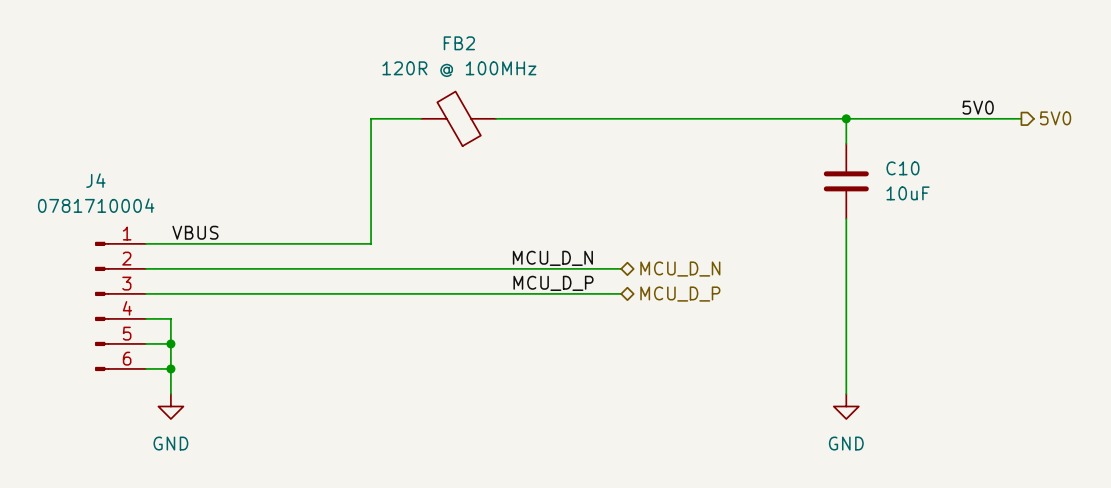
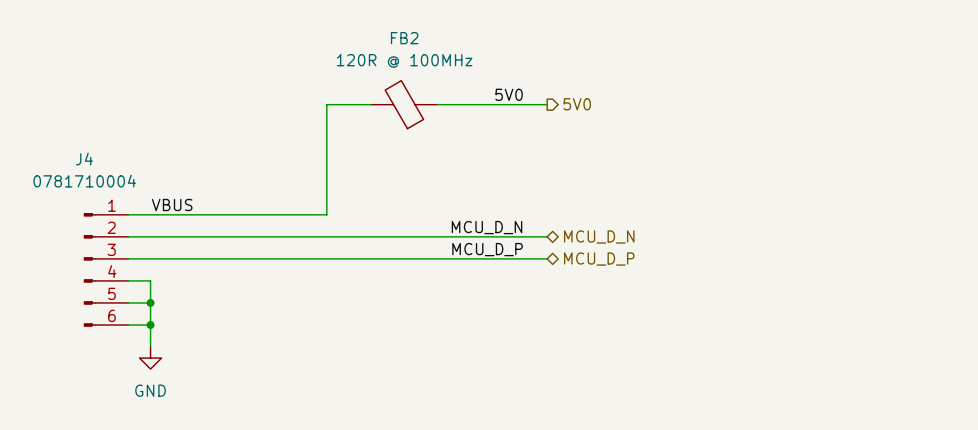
label: none -> 5V0 (509, 94)
label: 5V0 (978, 107) -> none
wire: (621, 118) (1021, 118) -> none
hierarchical label: none -> 5V0 (577, 104)
wire: (846, 118) (846, 143) -> none
junction: (846, 118) -> none
hierarchical label: 5V0 (1055, 118) -> none
C10: 10uF (846, 181) -> none
wire: (846, 218) (846, 393) -> none
power symbol: GND (846, 406) -> none

